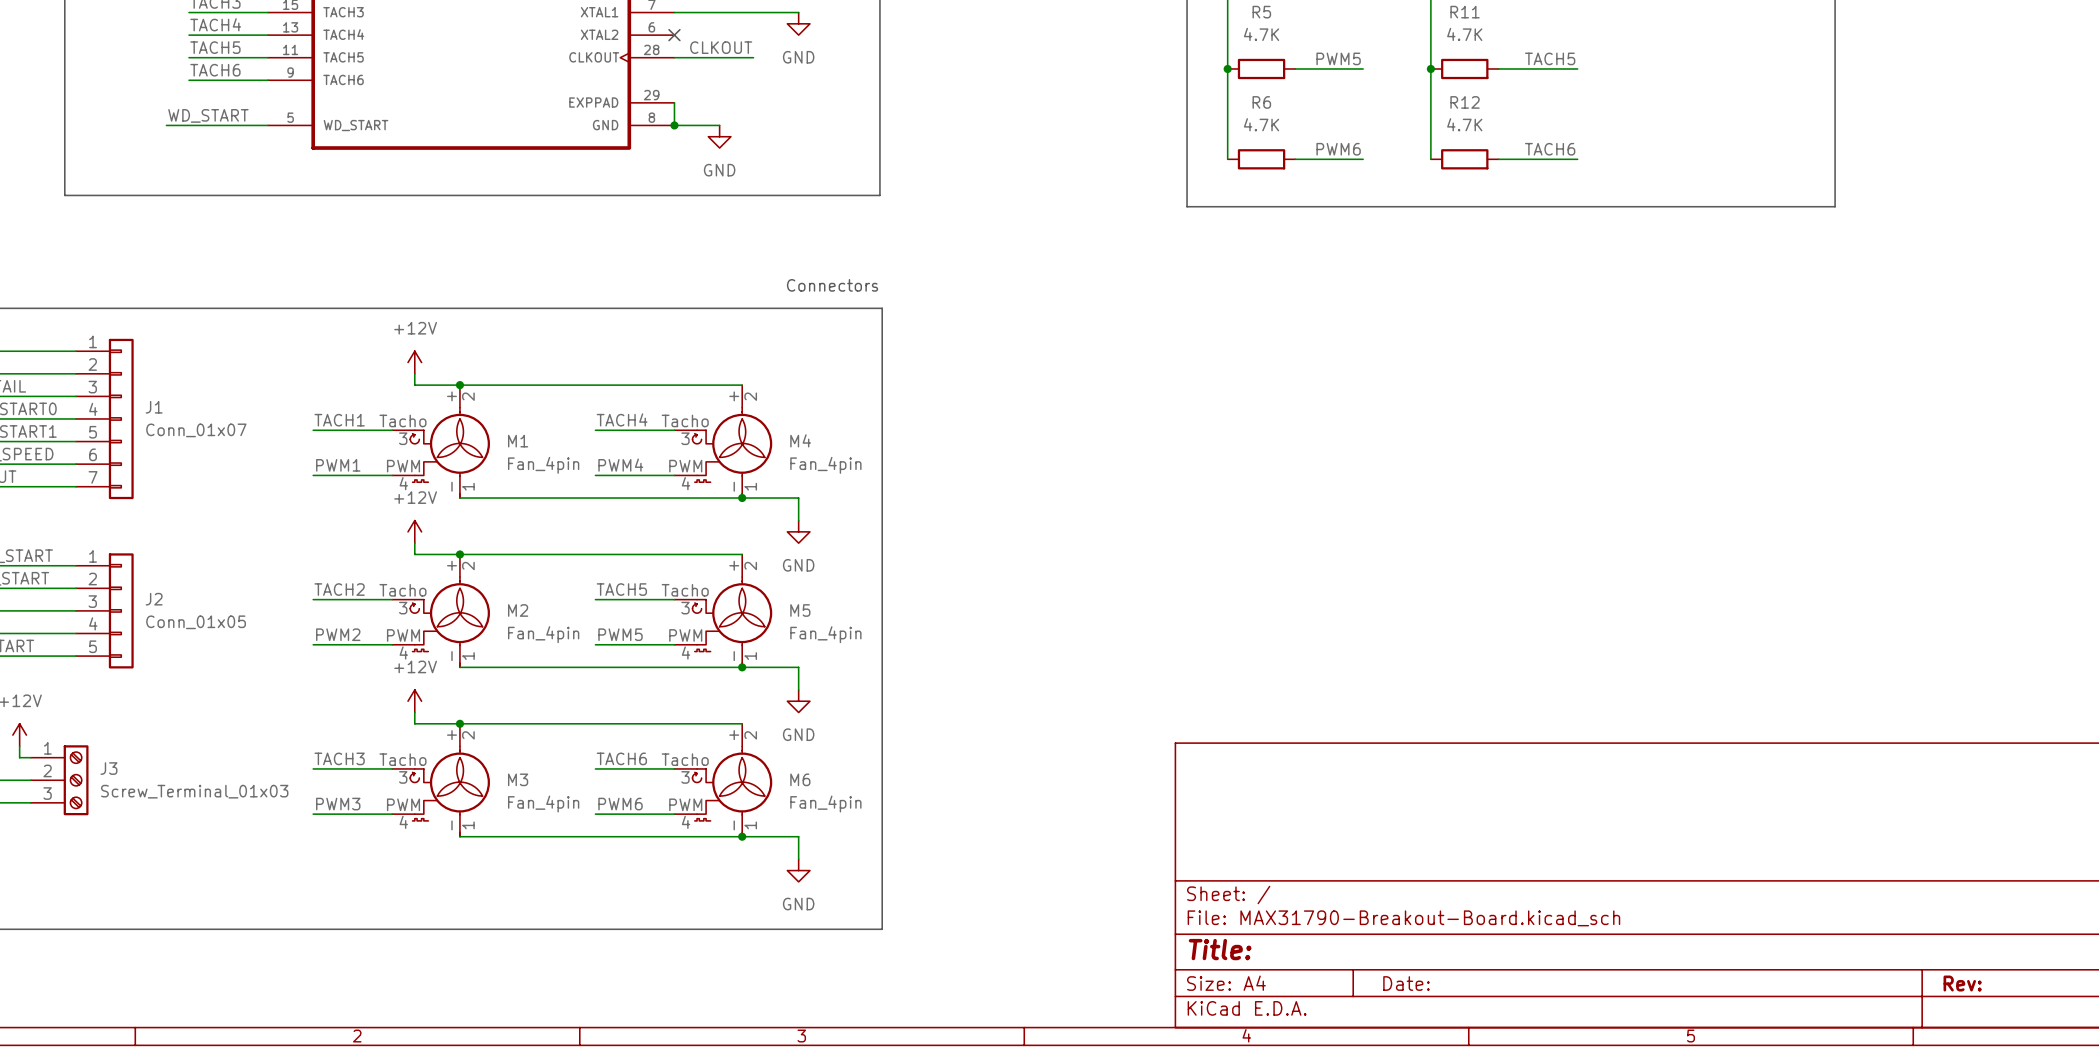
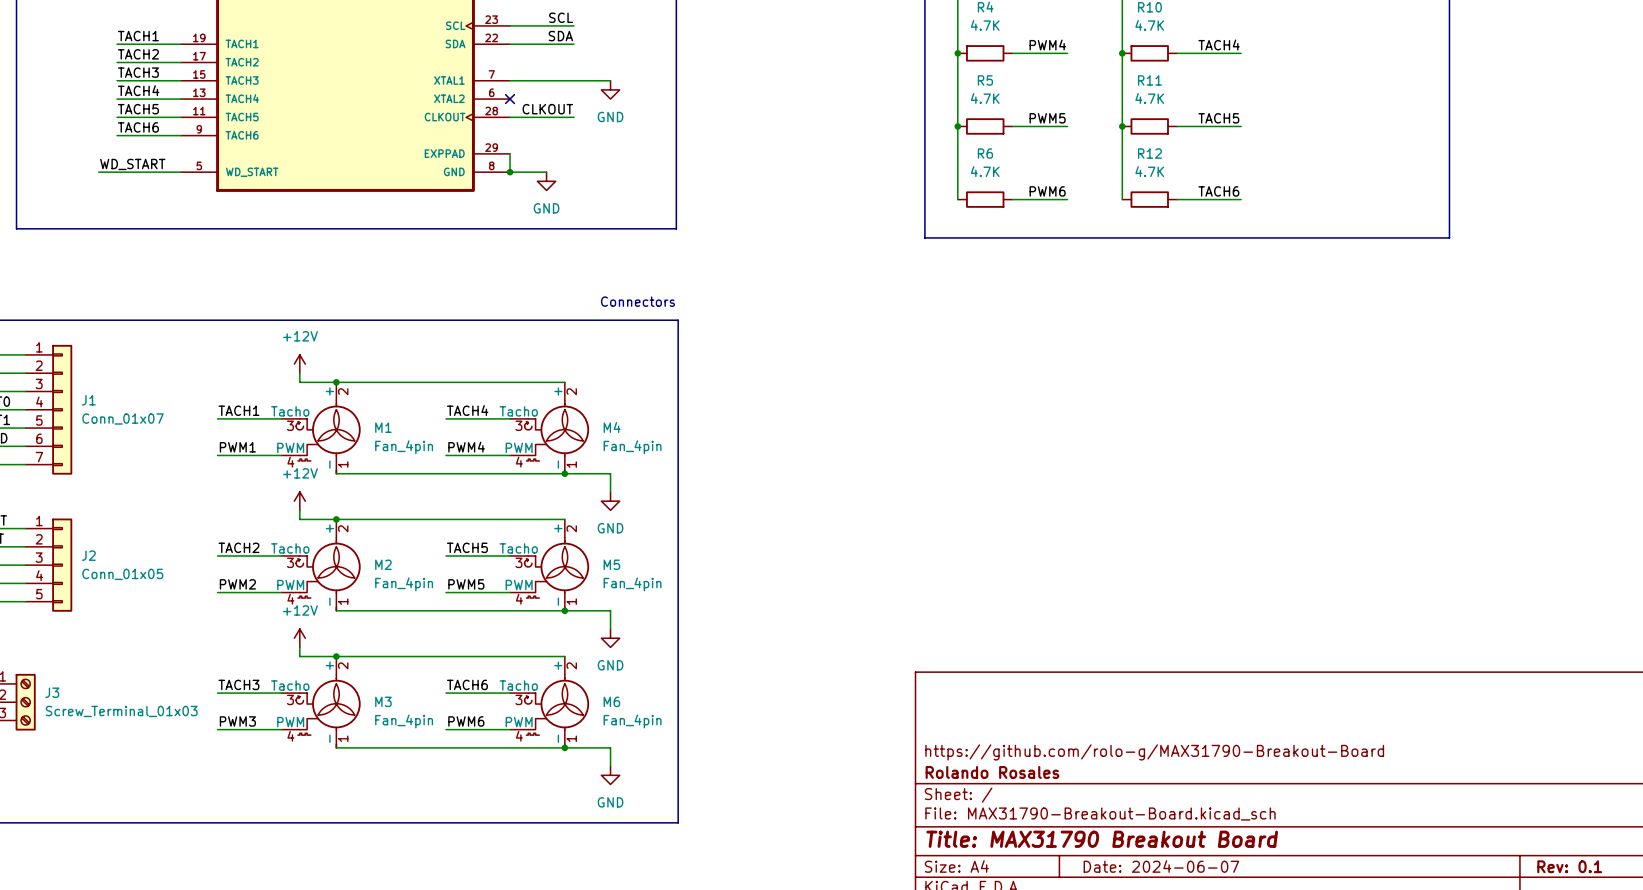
title block: none -> https://github.com/rolo-g/MAX31790-Breakout-Board (1154, 752)
title block: none -> Rolando Rosales (992, 772)
title block: Title: (1220, 949) -> Title: MAX31790 Breakout Board (1102, 839)
title block: Date: (1406, 983) -> Date: 2024-06-07 (1161, 866)
title block: Rev: (1962, 983) -> Rev: 0.1 (1569, 866)

